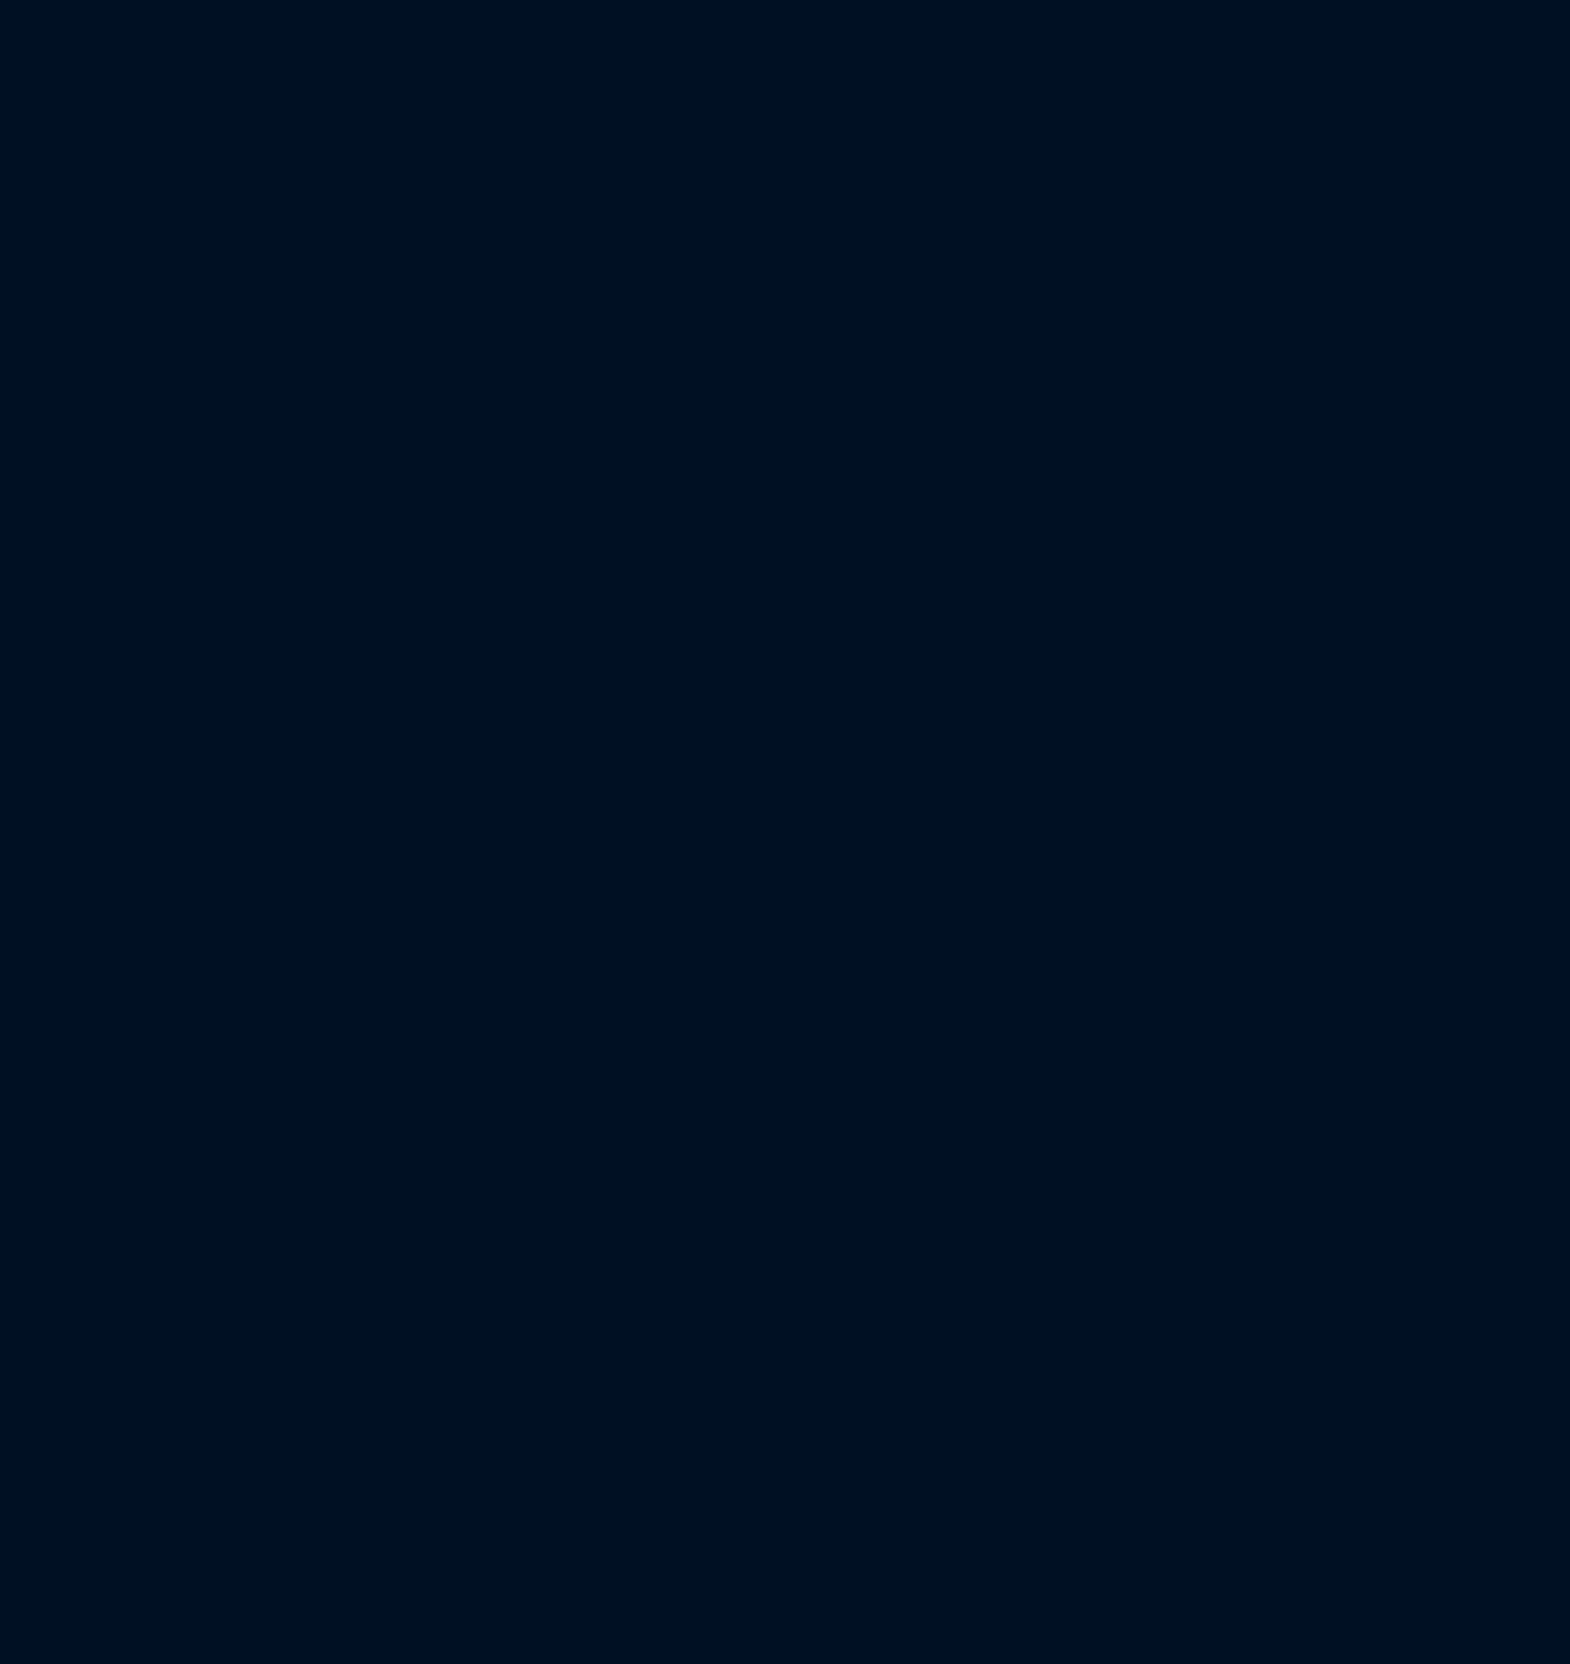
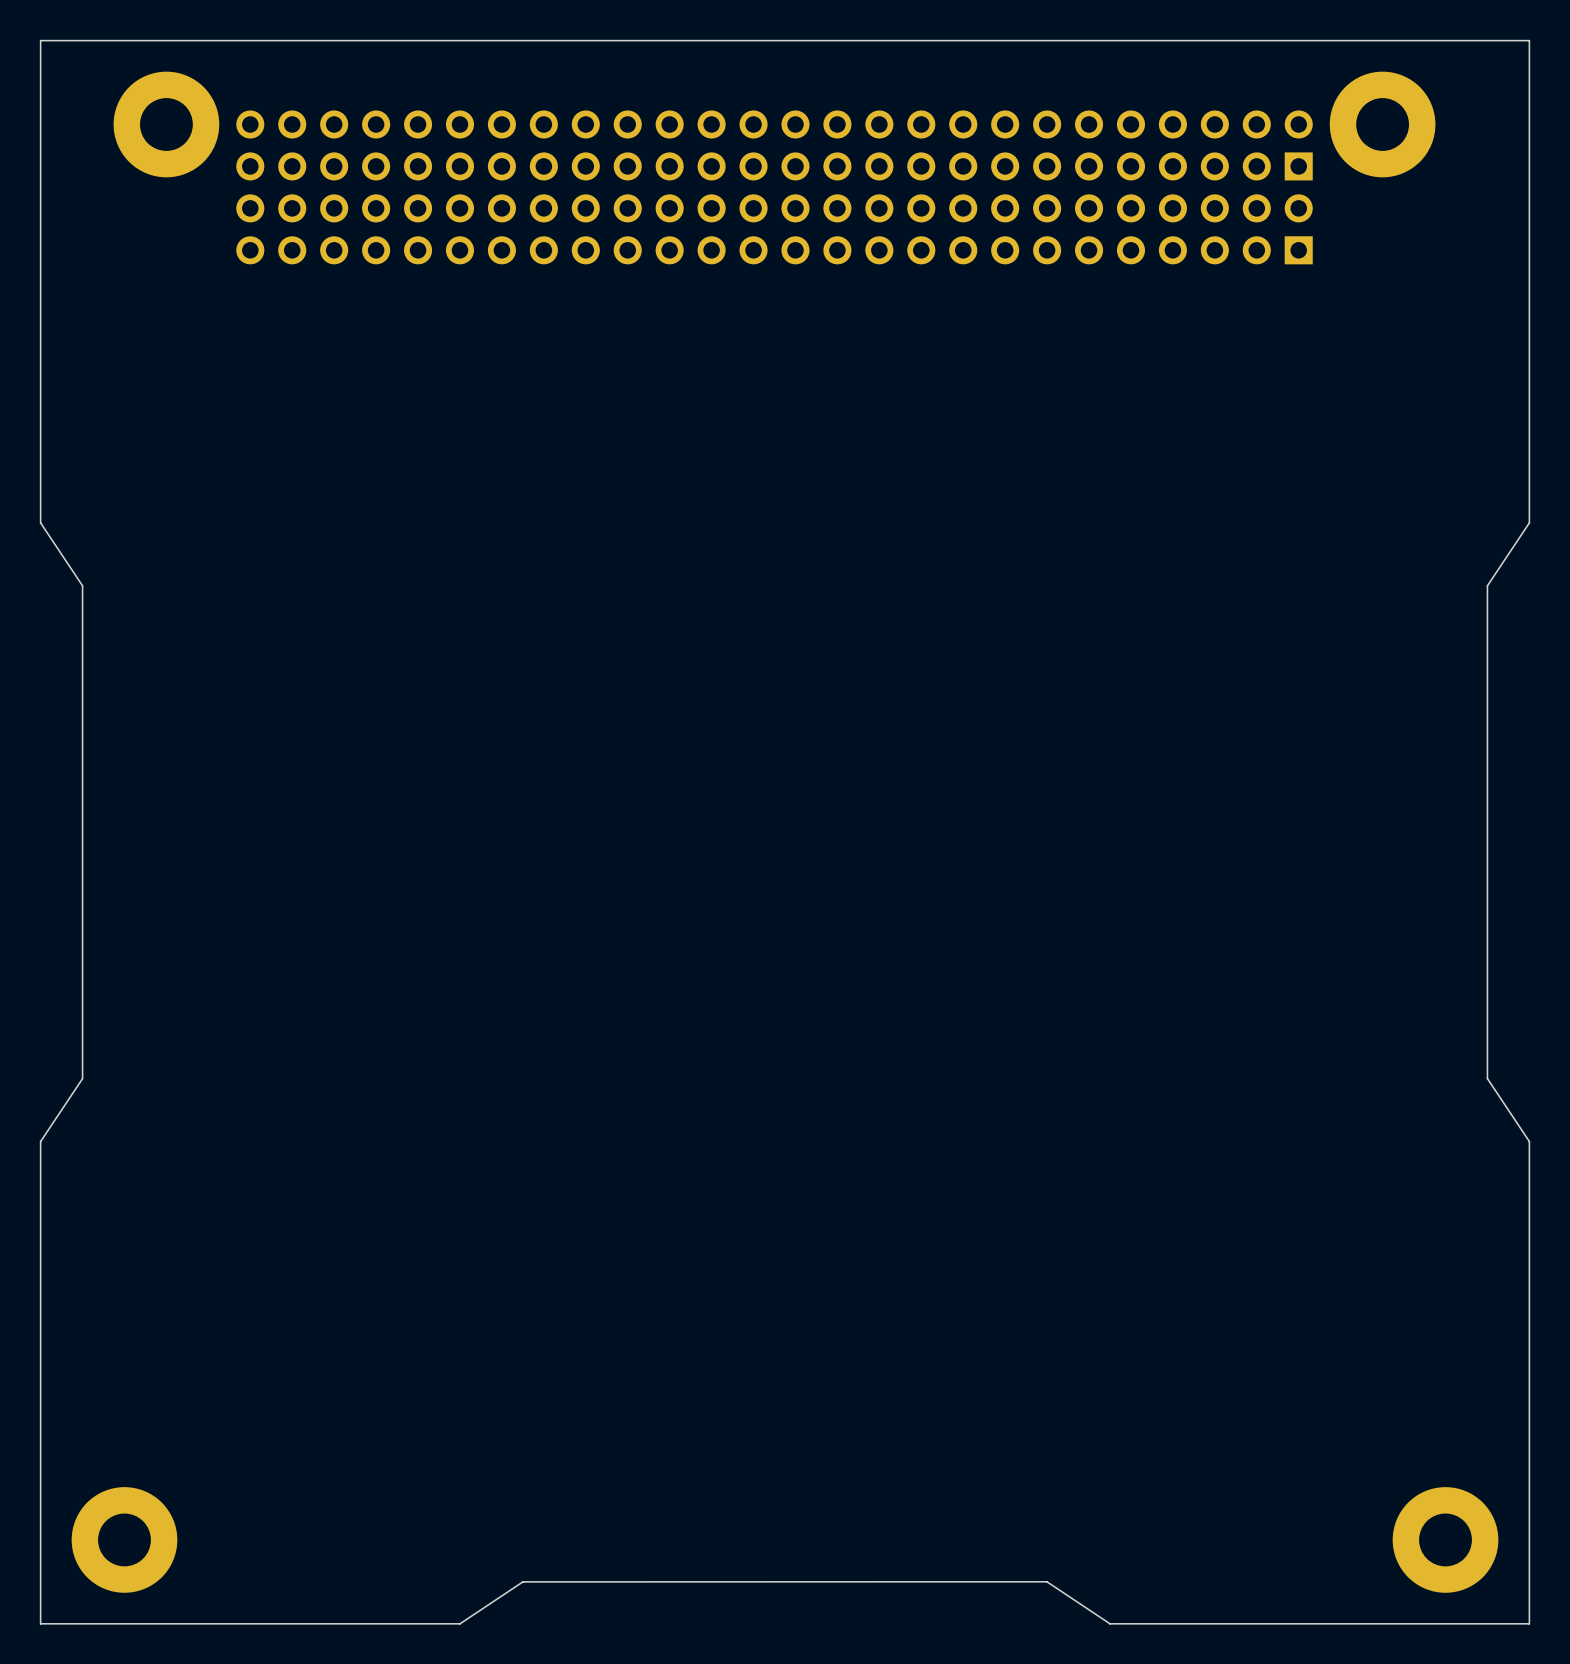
board edge: none -> (1529, 40) (1529, 522) (1487, 585) (1487, 1078) (1529, 1141) (1529, 1623) (1110, 1623) (1047, 1581) (522, 1581) (459, 1623) (40, 1623) (40, 1141) (82, 1078) (82, 585) (40, 522) (40, 40) (1529, 40)
part: none -> (166, 124)
part: none -> (1382, 124)
part: none -> (774, 145)
part: none -> (774, 229)
part: none -> (124, 1539)
part: none -> (1445, 1539)

